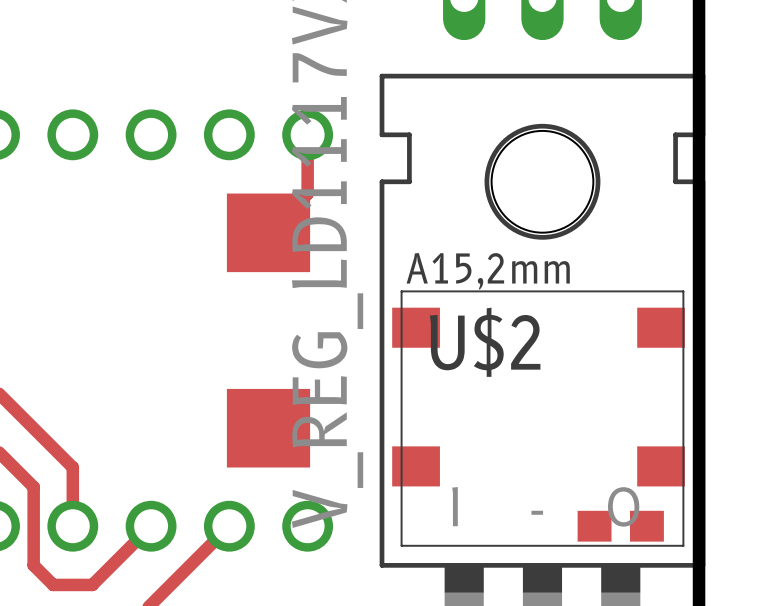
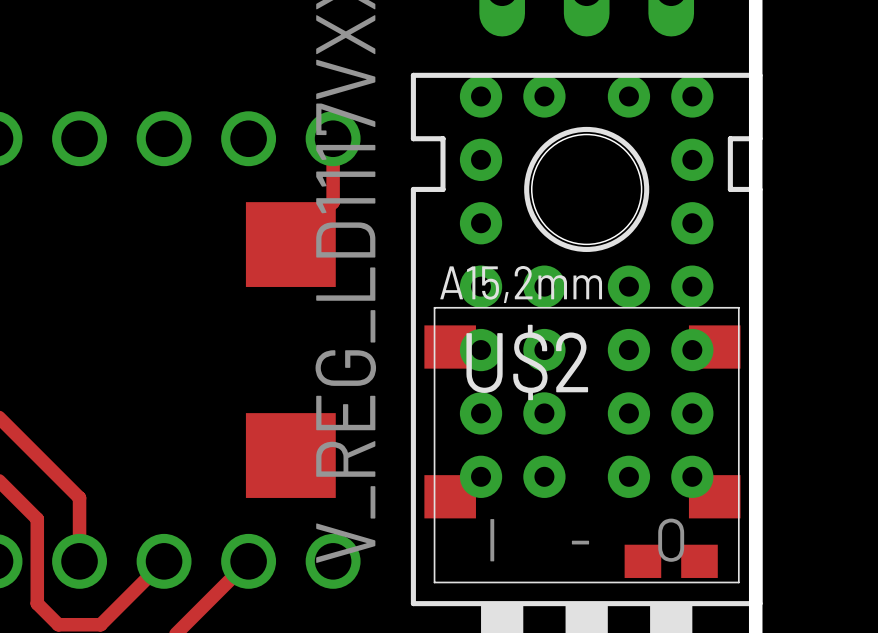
via: none -> (481, 96)
via: none -> (544, 96)
via: none -> (628, 96)
via: none -> (692, 96)
via: none -> (481, 159)
via: none -> (692, 159)
via: none -> (481, 223)
via: none -> (692, 223)
via: none -> (481, 286)
via: none -> (544, 286)
via: none -> (628, 286)
via: none -> (692, 286)
via: none -> (481, 350)
via: none -> (544, 350)
via: none -> (628, 350)
via: none -> (692, 350)
via: none -> (481, 413)
via: none -> (544, 413)
via: none -> (628, 413)
via: none -> (692, 413)
via: none -> (481, 476)
via: none -> (544, 476)
via: none -> (628, 476)
via: none -> (692, 476)

